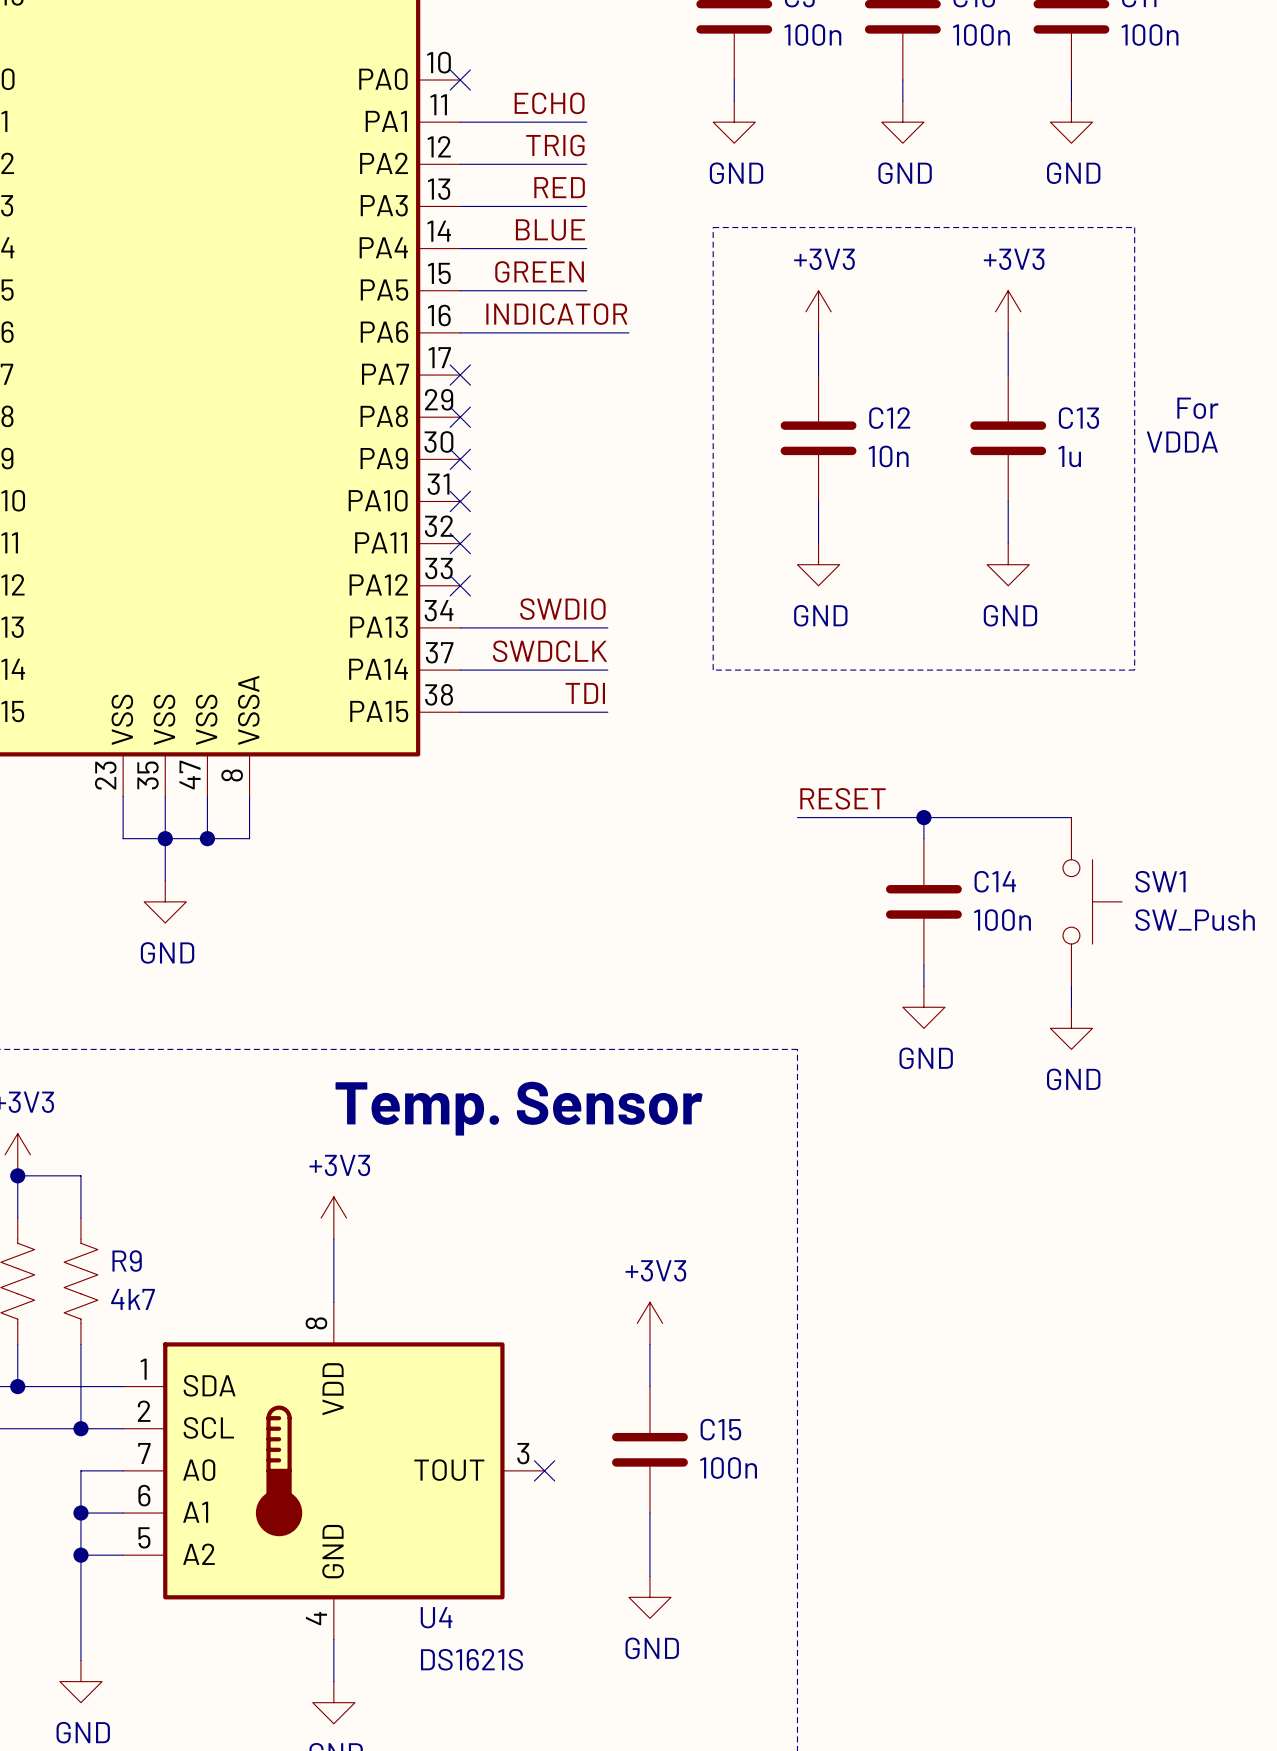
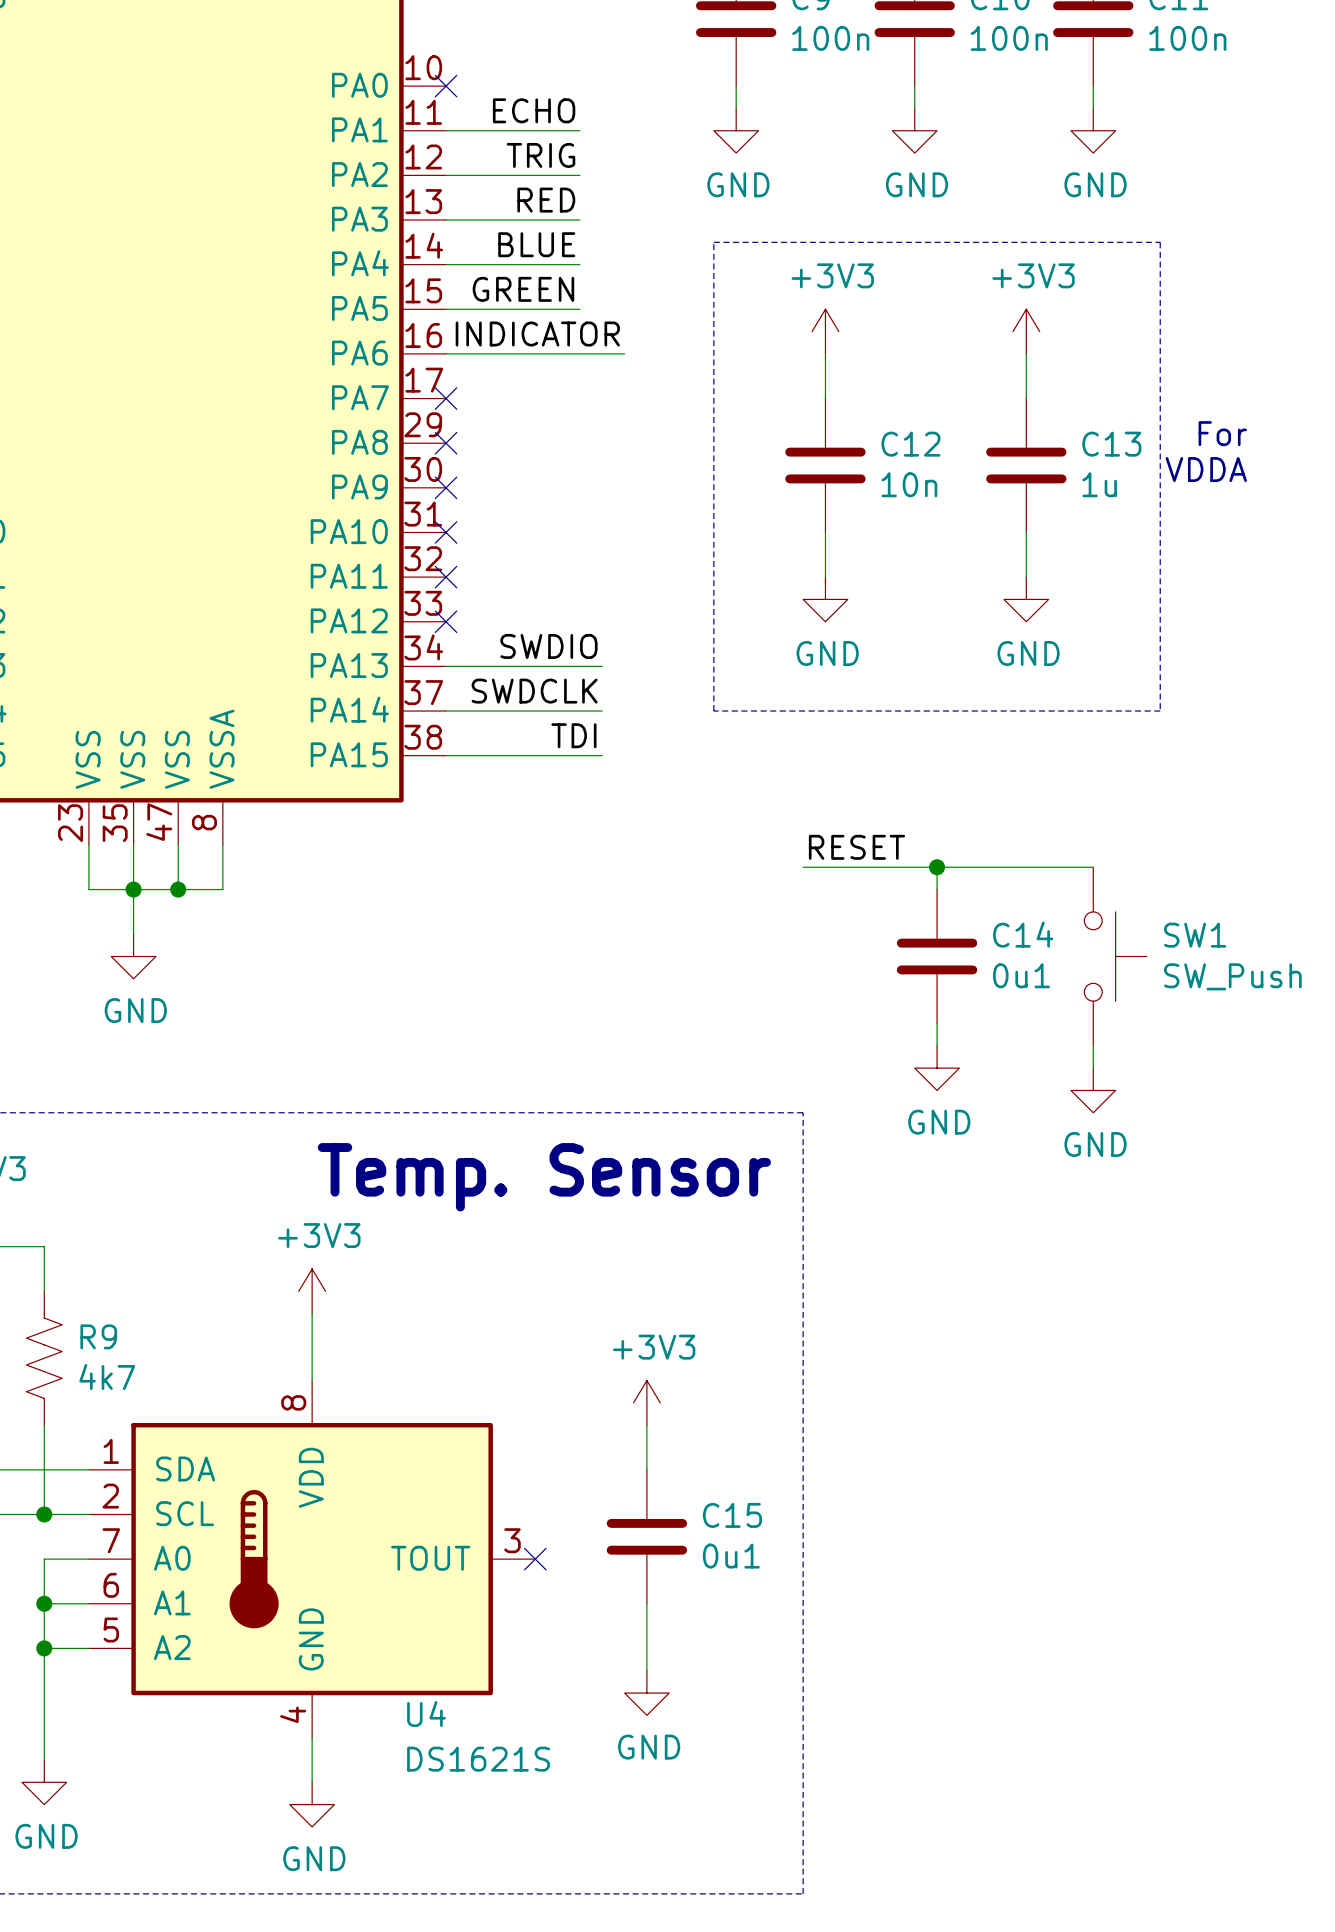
C14 value: 100n (1002, 920) -> 0u1 (1021, 975)
C15 value: 100n (728, 1468) -> 0u1 (731, 1556)

